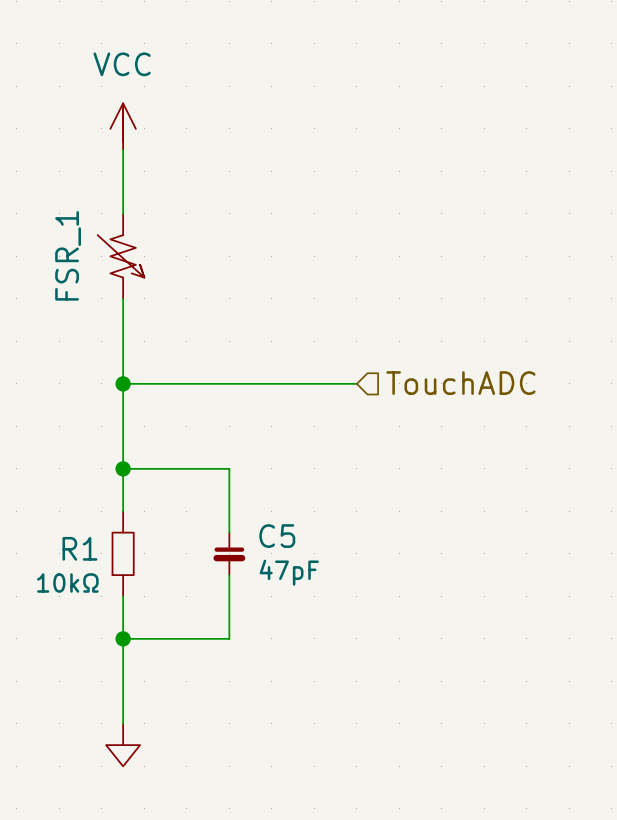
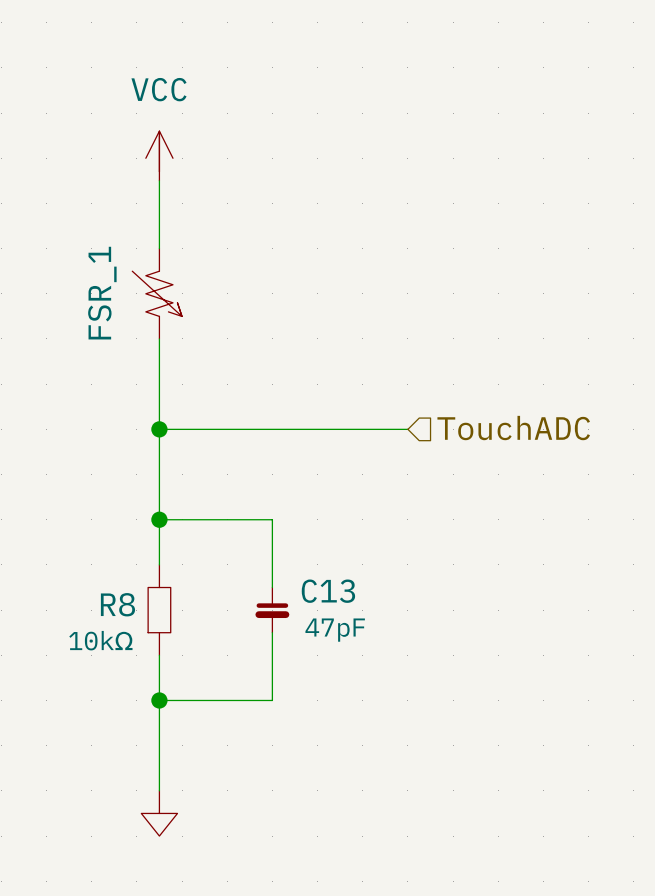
C5 name: C5 (277, 536) -> C13 (328, 591)
R1 name: R1 (79, 548) -> R8 (117, 604)

